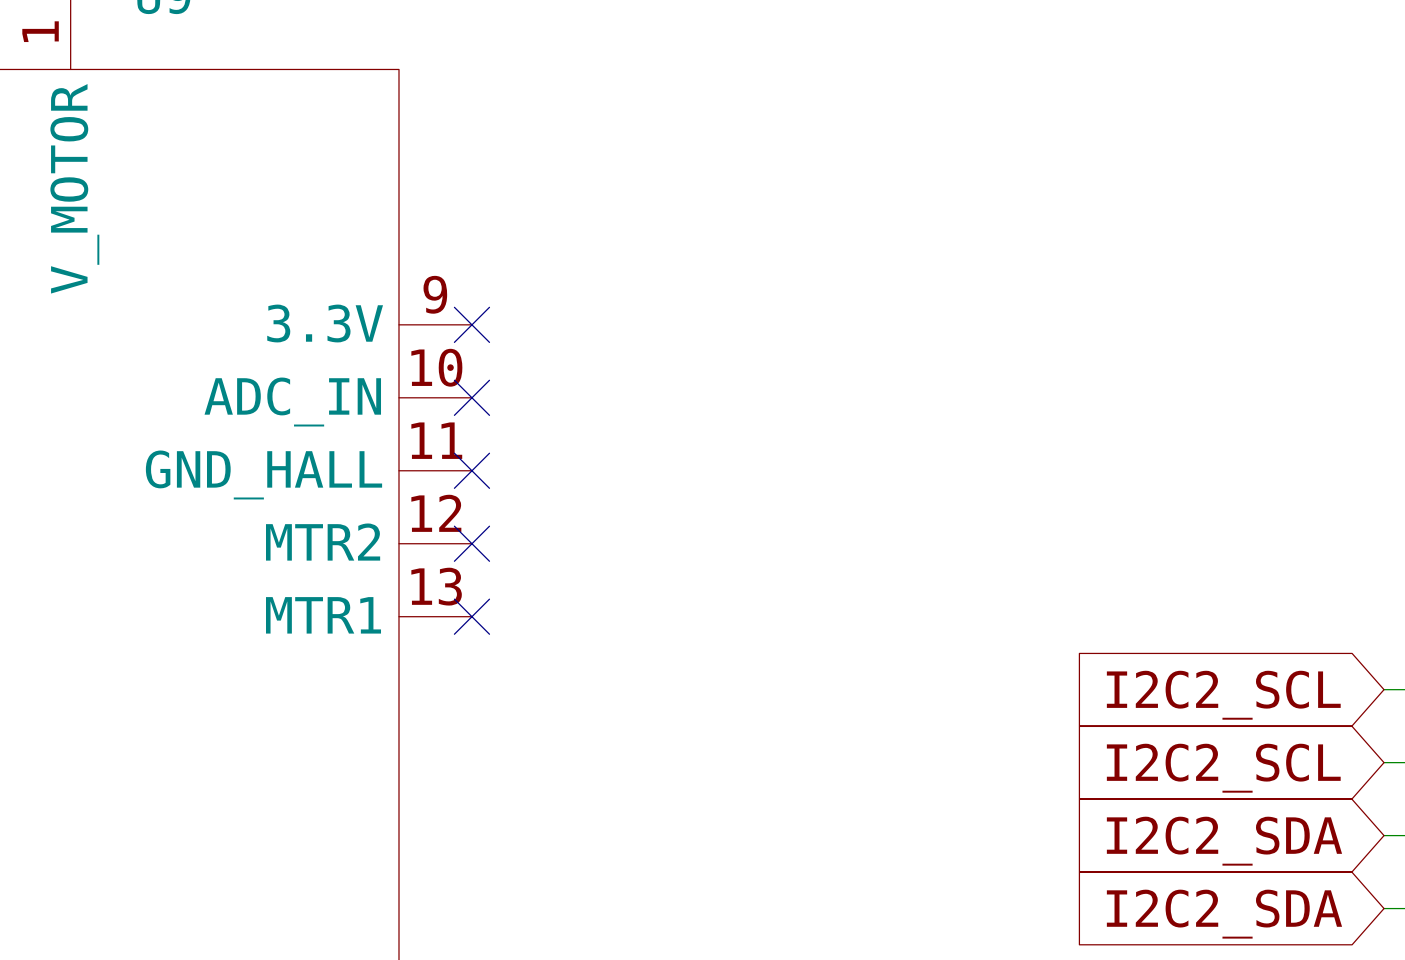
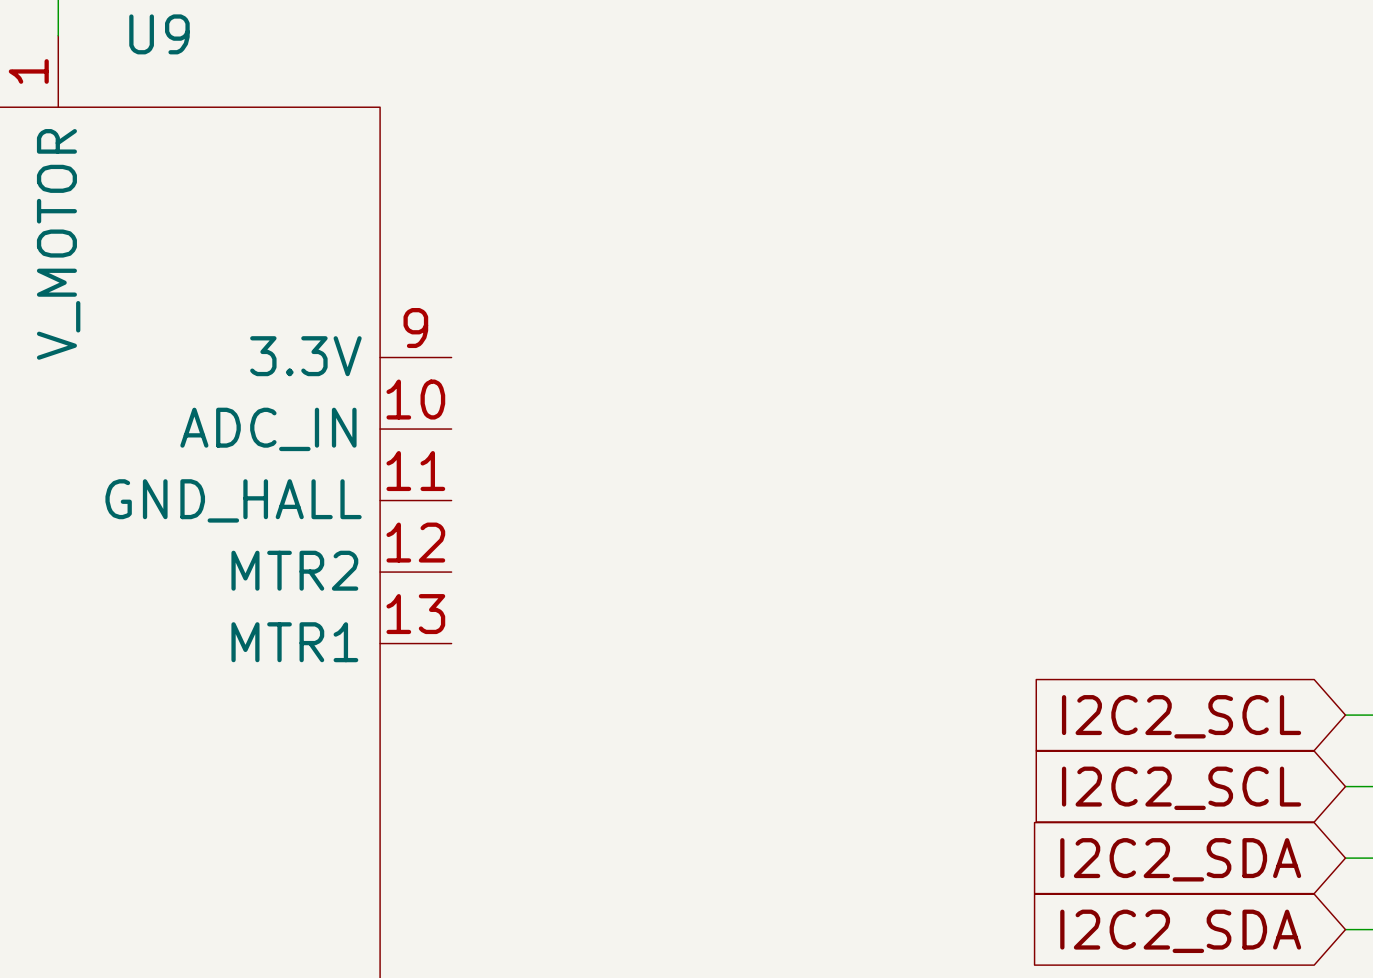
no-connect mark: (471, 324) -> none
no-connect mark: (471, 397) -> none
no-connect mark: (471, 470) -> none
no-connect mark: (471, 543) -> none
no-connect mark: (471, 616) -> none

